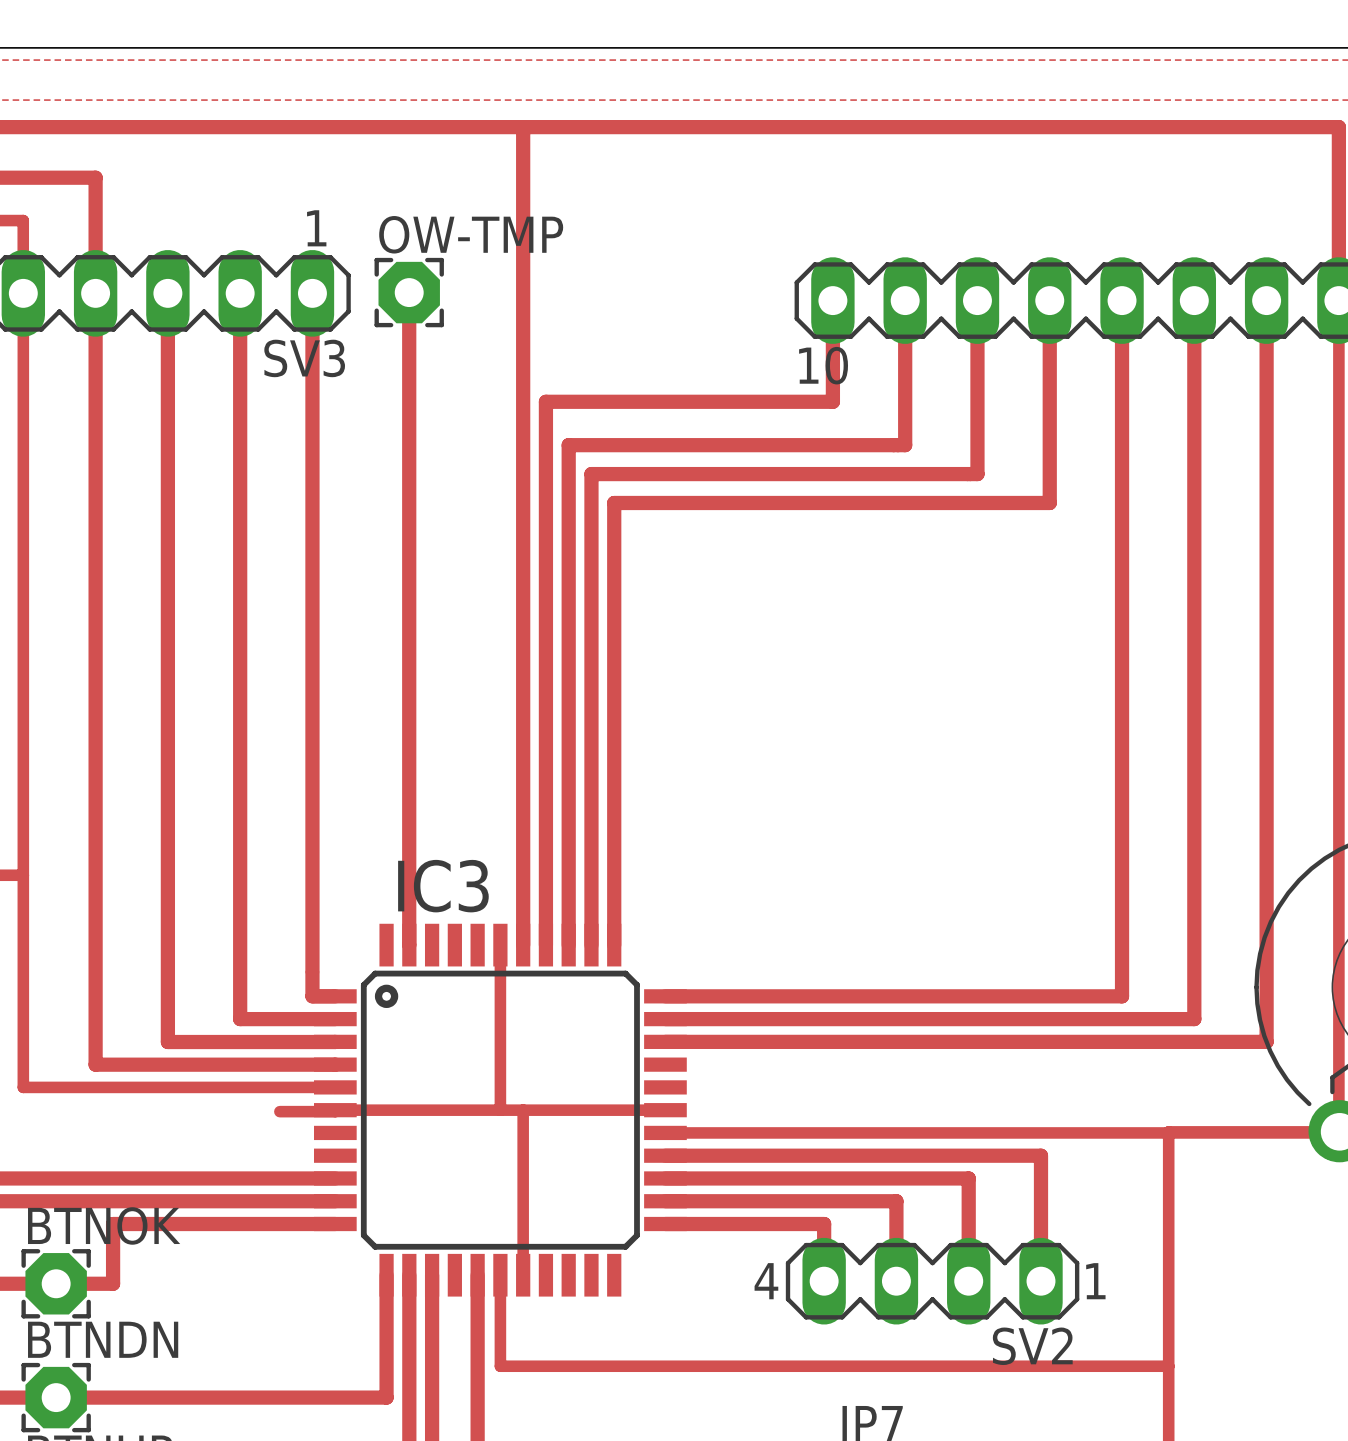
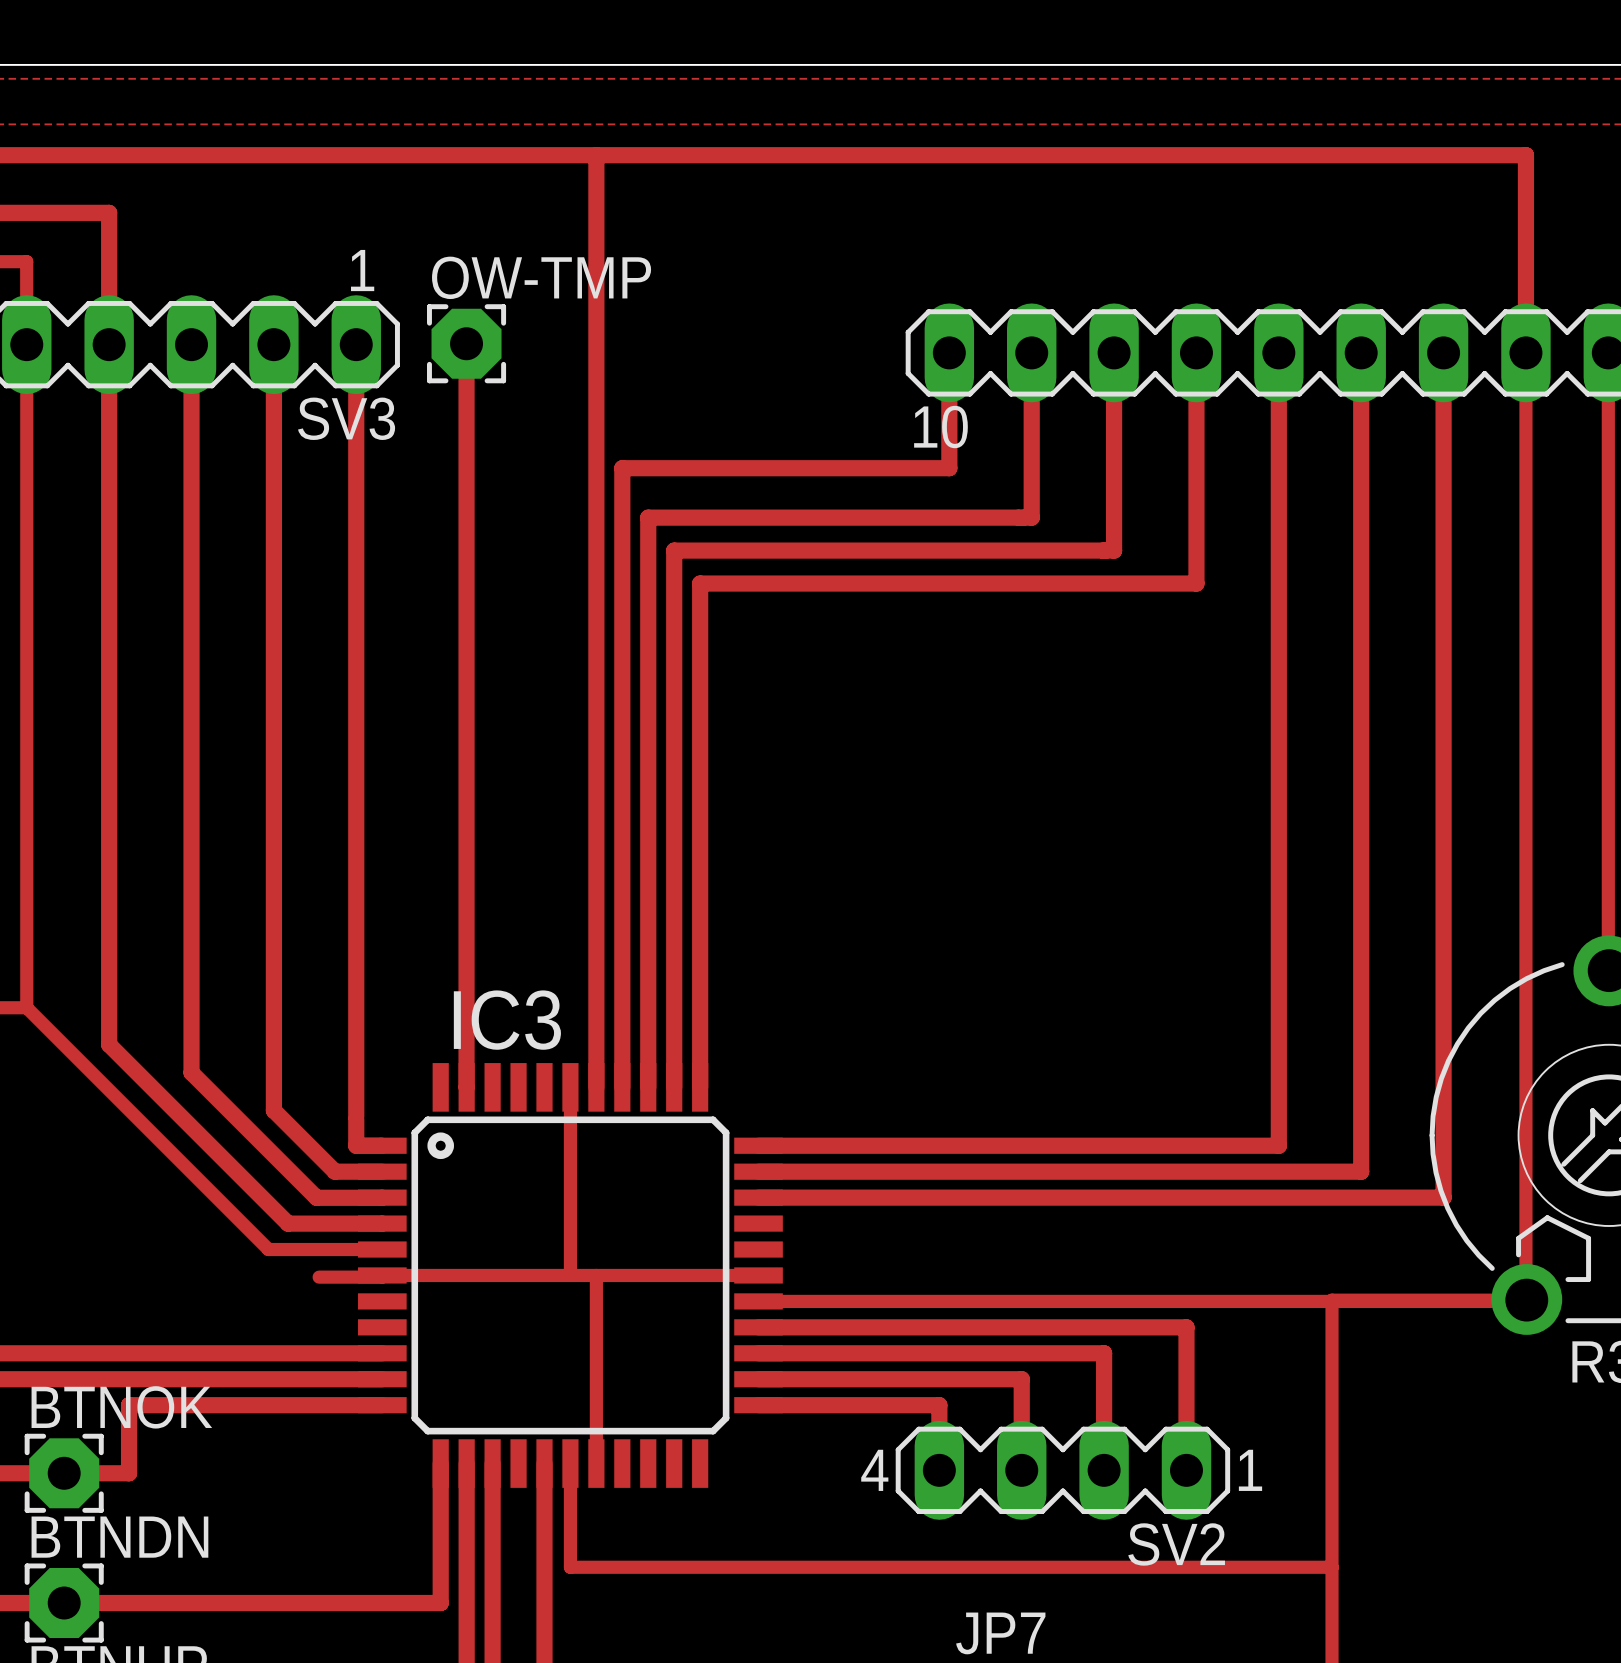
track: (23, 875) (23, 1087) (235, 1087) -> (26, 1007) (268, 1249)
track: (95, 907) (95, 1064) (252, 1064) -> (109, 1044) (288, 1223)
track: (167, 932) (167, 1042) (277, 1042) -> (191, 1072) (316, 1197)
track: (240, 965) (240, 1019) (293, 1019) -> (273, 1110) (335, 1171)

